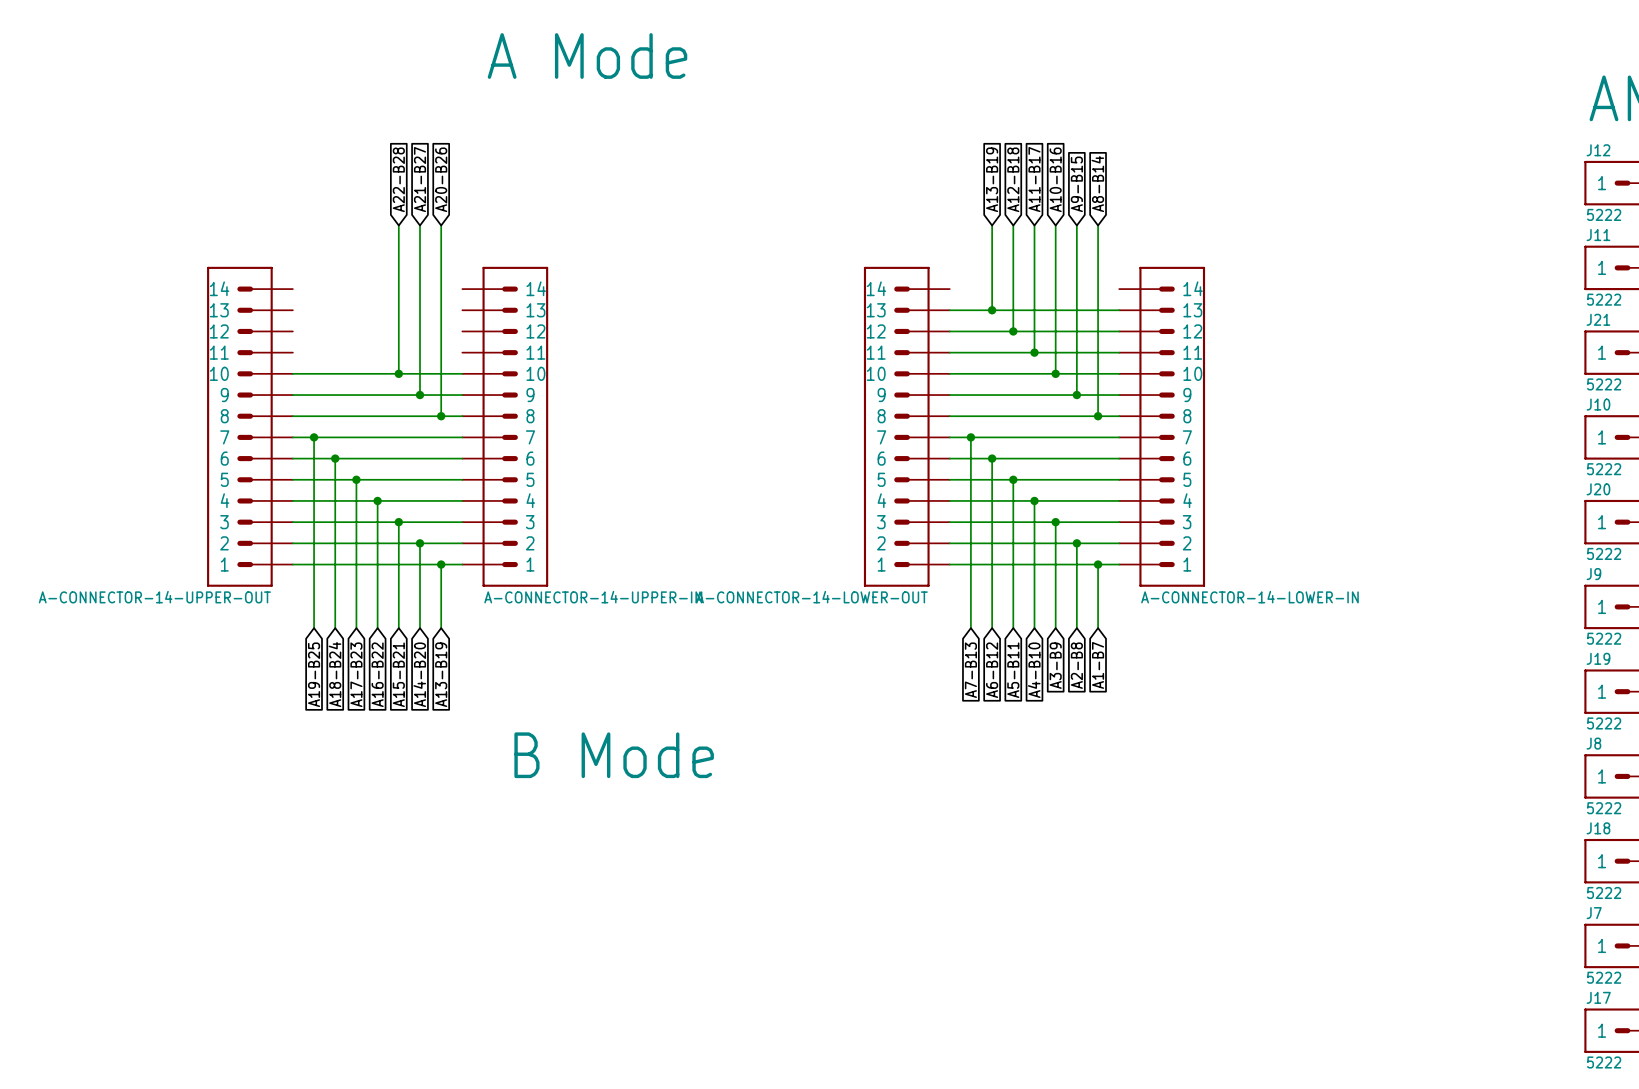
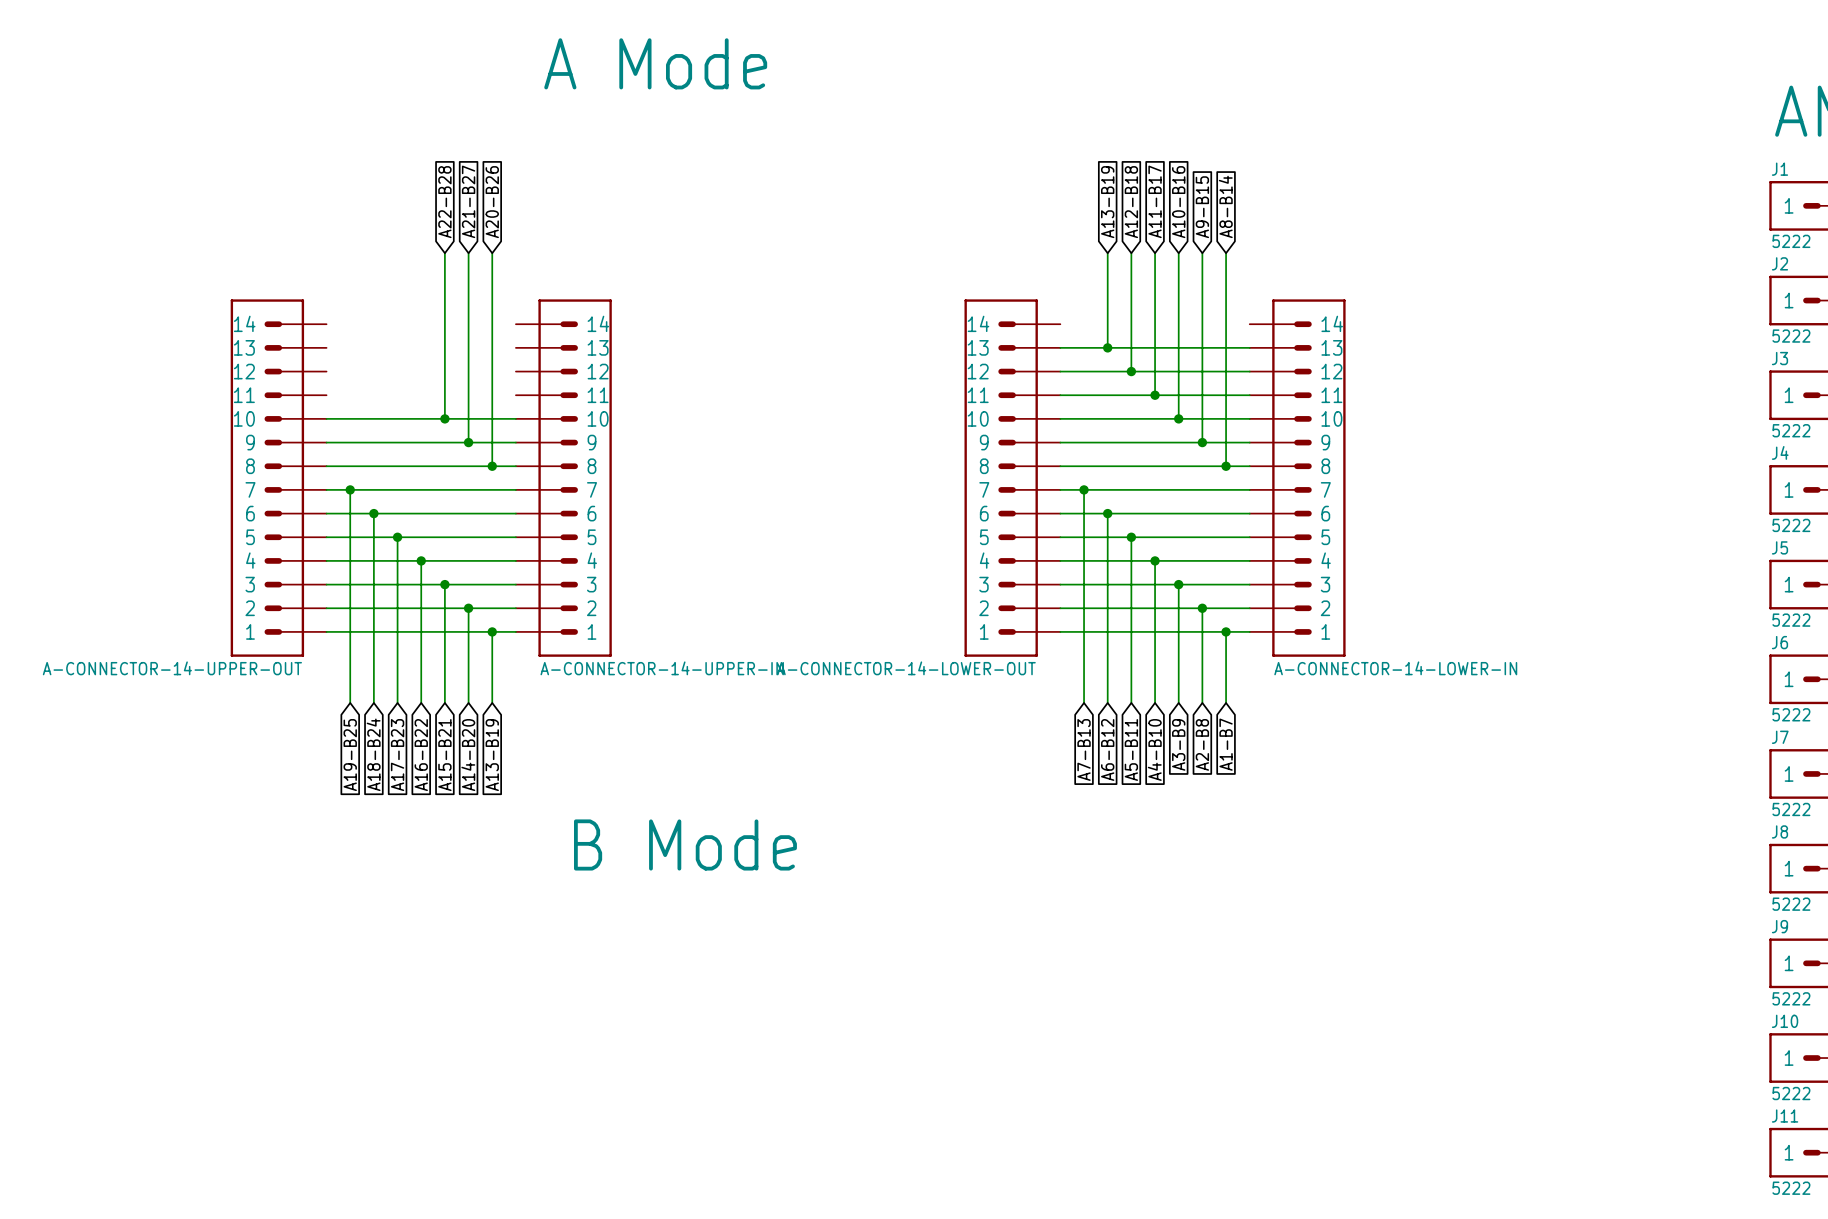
J12 name: J12 (1598, 150) -> J1 (1779, 169)
J11 name: J11 (1598, 235) -> J2 (1779, 263)
J21 name: J21 (1598, 319) -> J3 (1779, 358)
J10 name: J10 (1598, 404) -> J4 (1780, 452)
J20 name: J20 (1598, 489) -> J5 (1779, 547)
J9 name: J9 (1593, 574) -> J6 (1779, 642)
J19 name: J19 (1598, 658) -> J7 (1780, 737)
J18 name: J18 (1598, 828) -> J9 (1779, 926)
J7 name: J7 (1594, 913) -> J10 (1785, 1021)
J17 name: J17 (1598, 997) -> J11 (1785, 1116)

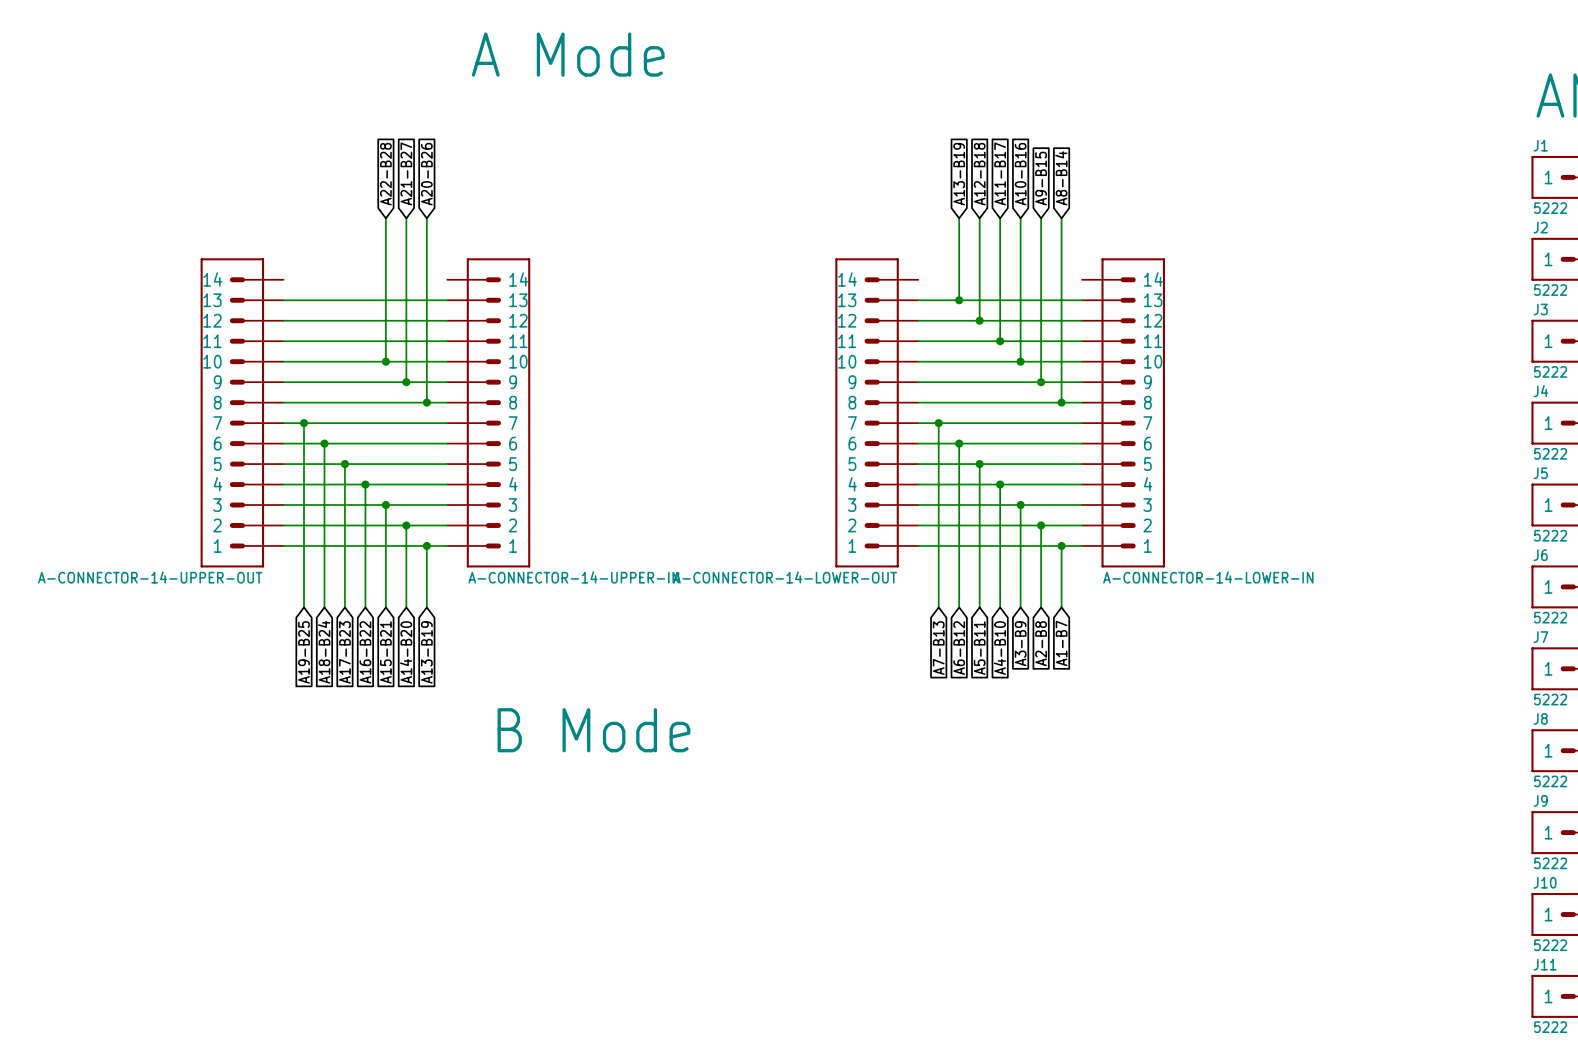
wire: none -> (283, 300) (447, 300)
wire: none -> (283, 320) (447, 320)
wire: none -> (283, 341) (447, 341)

